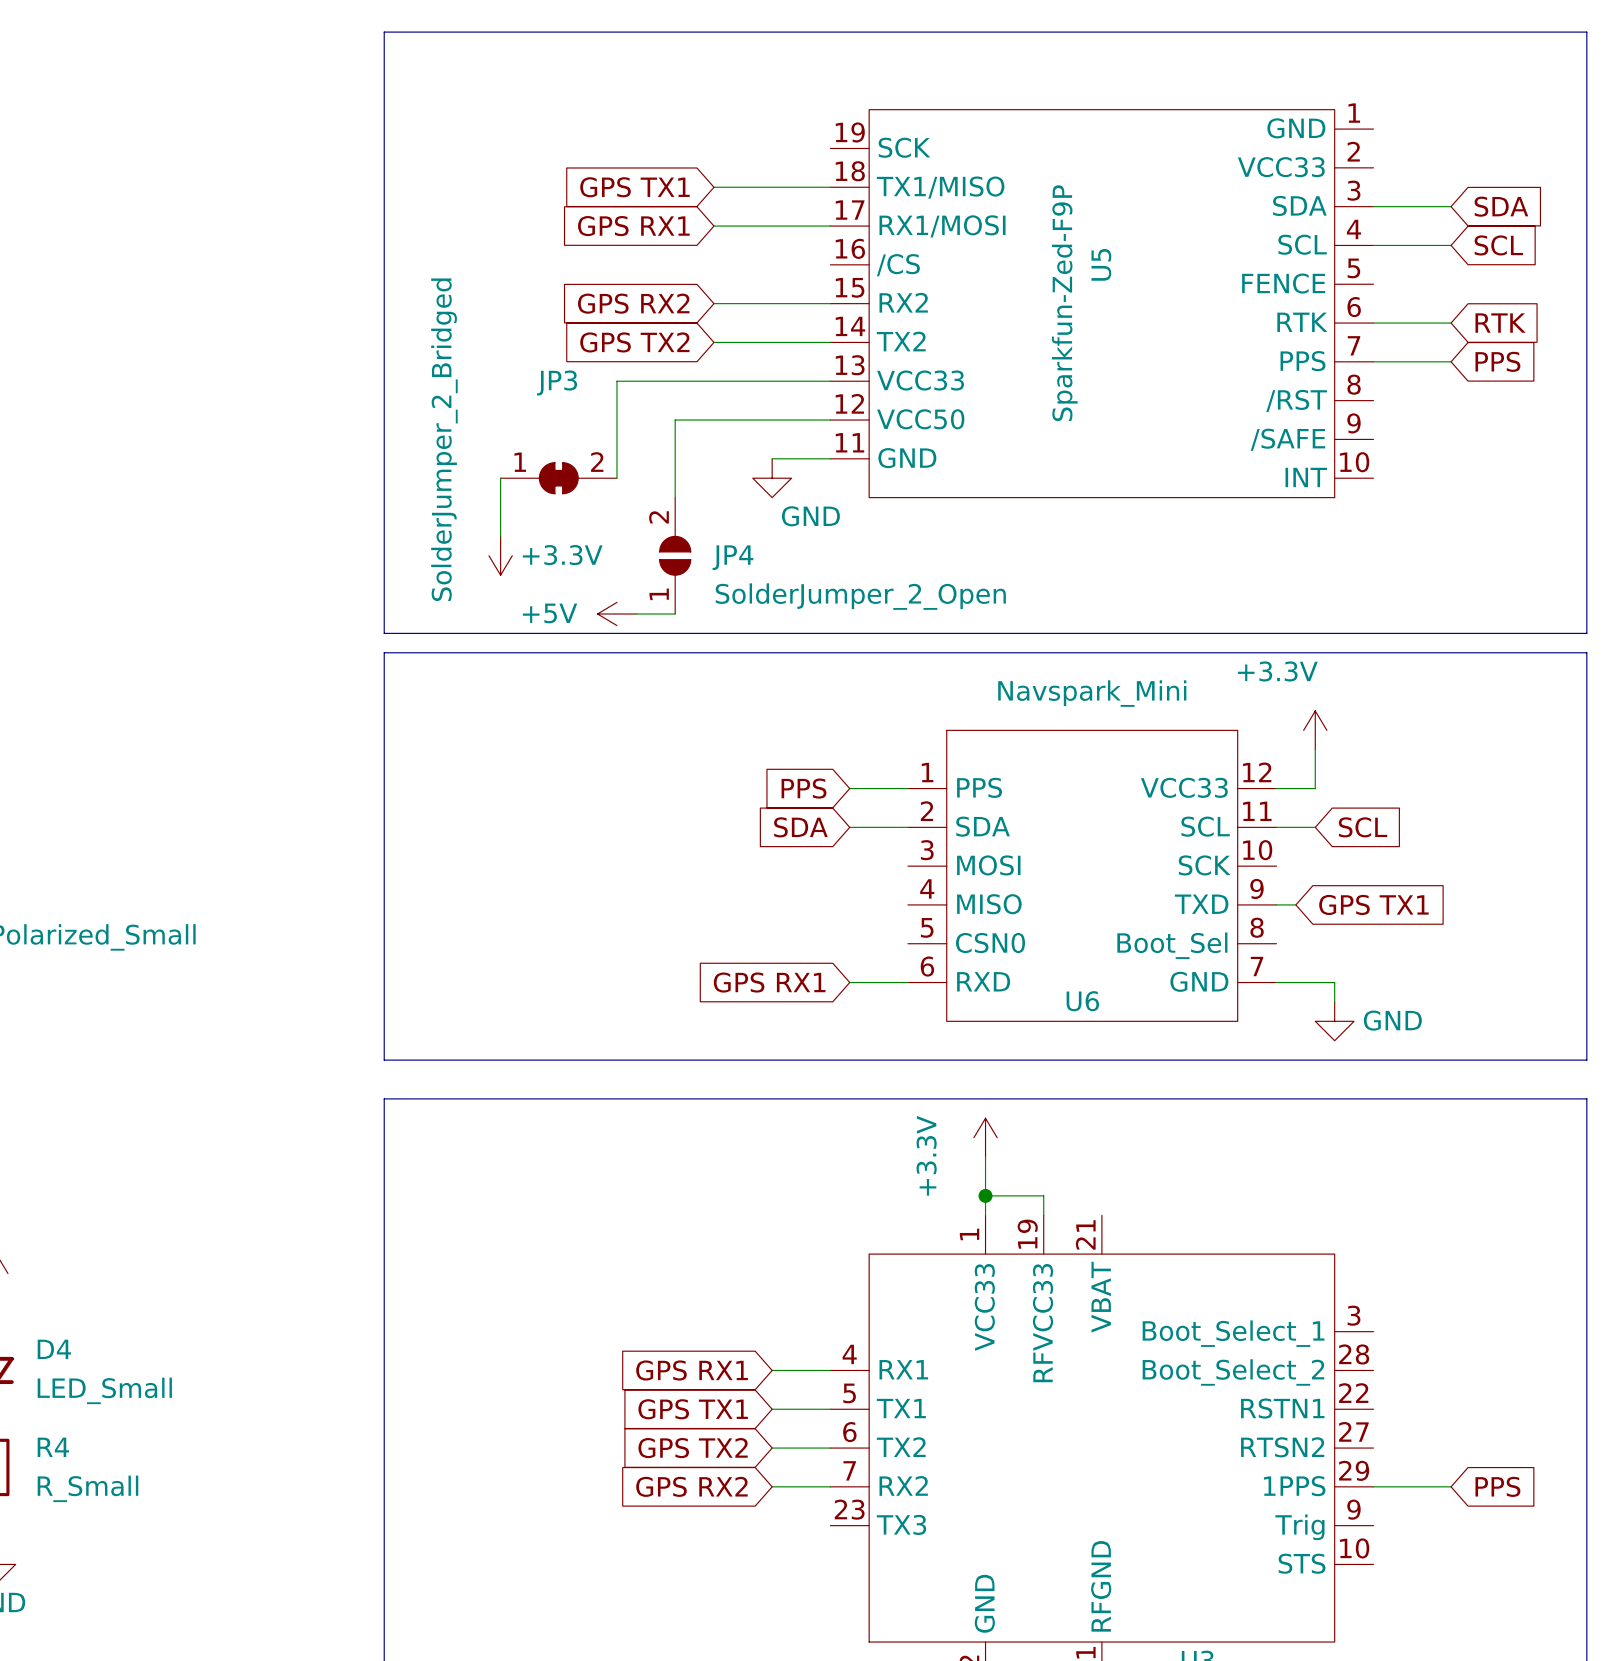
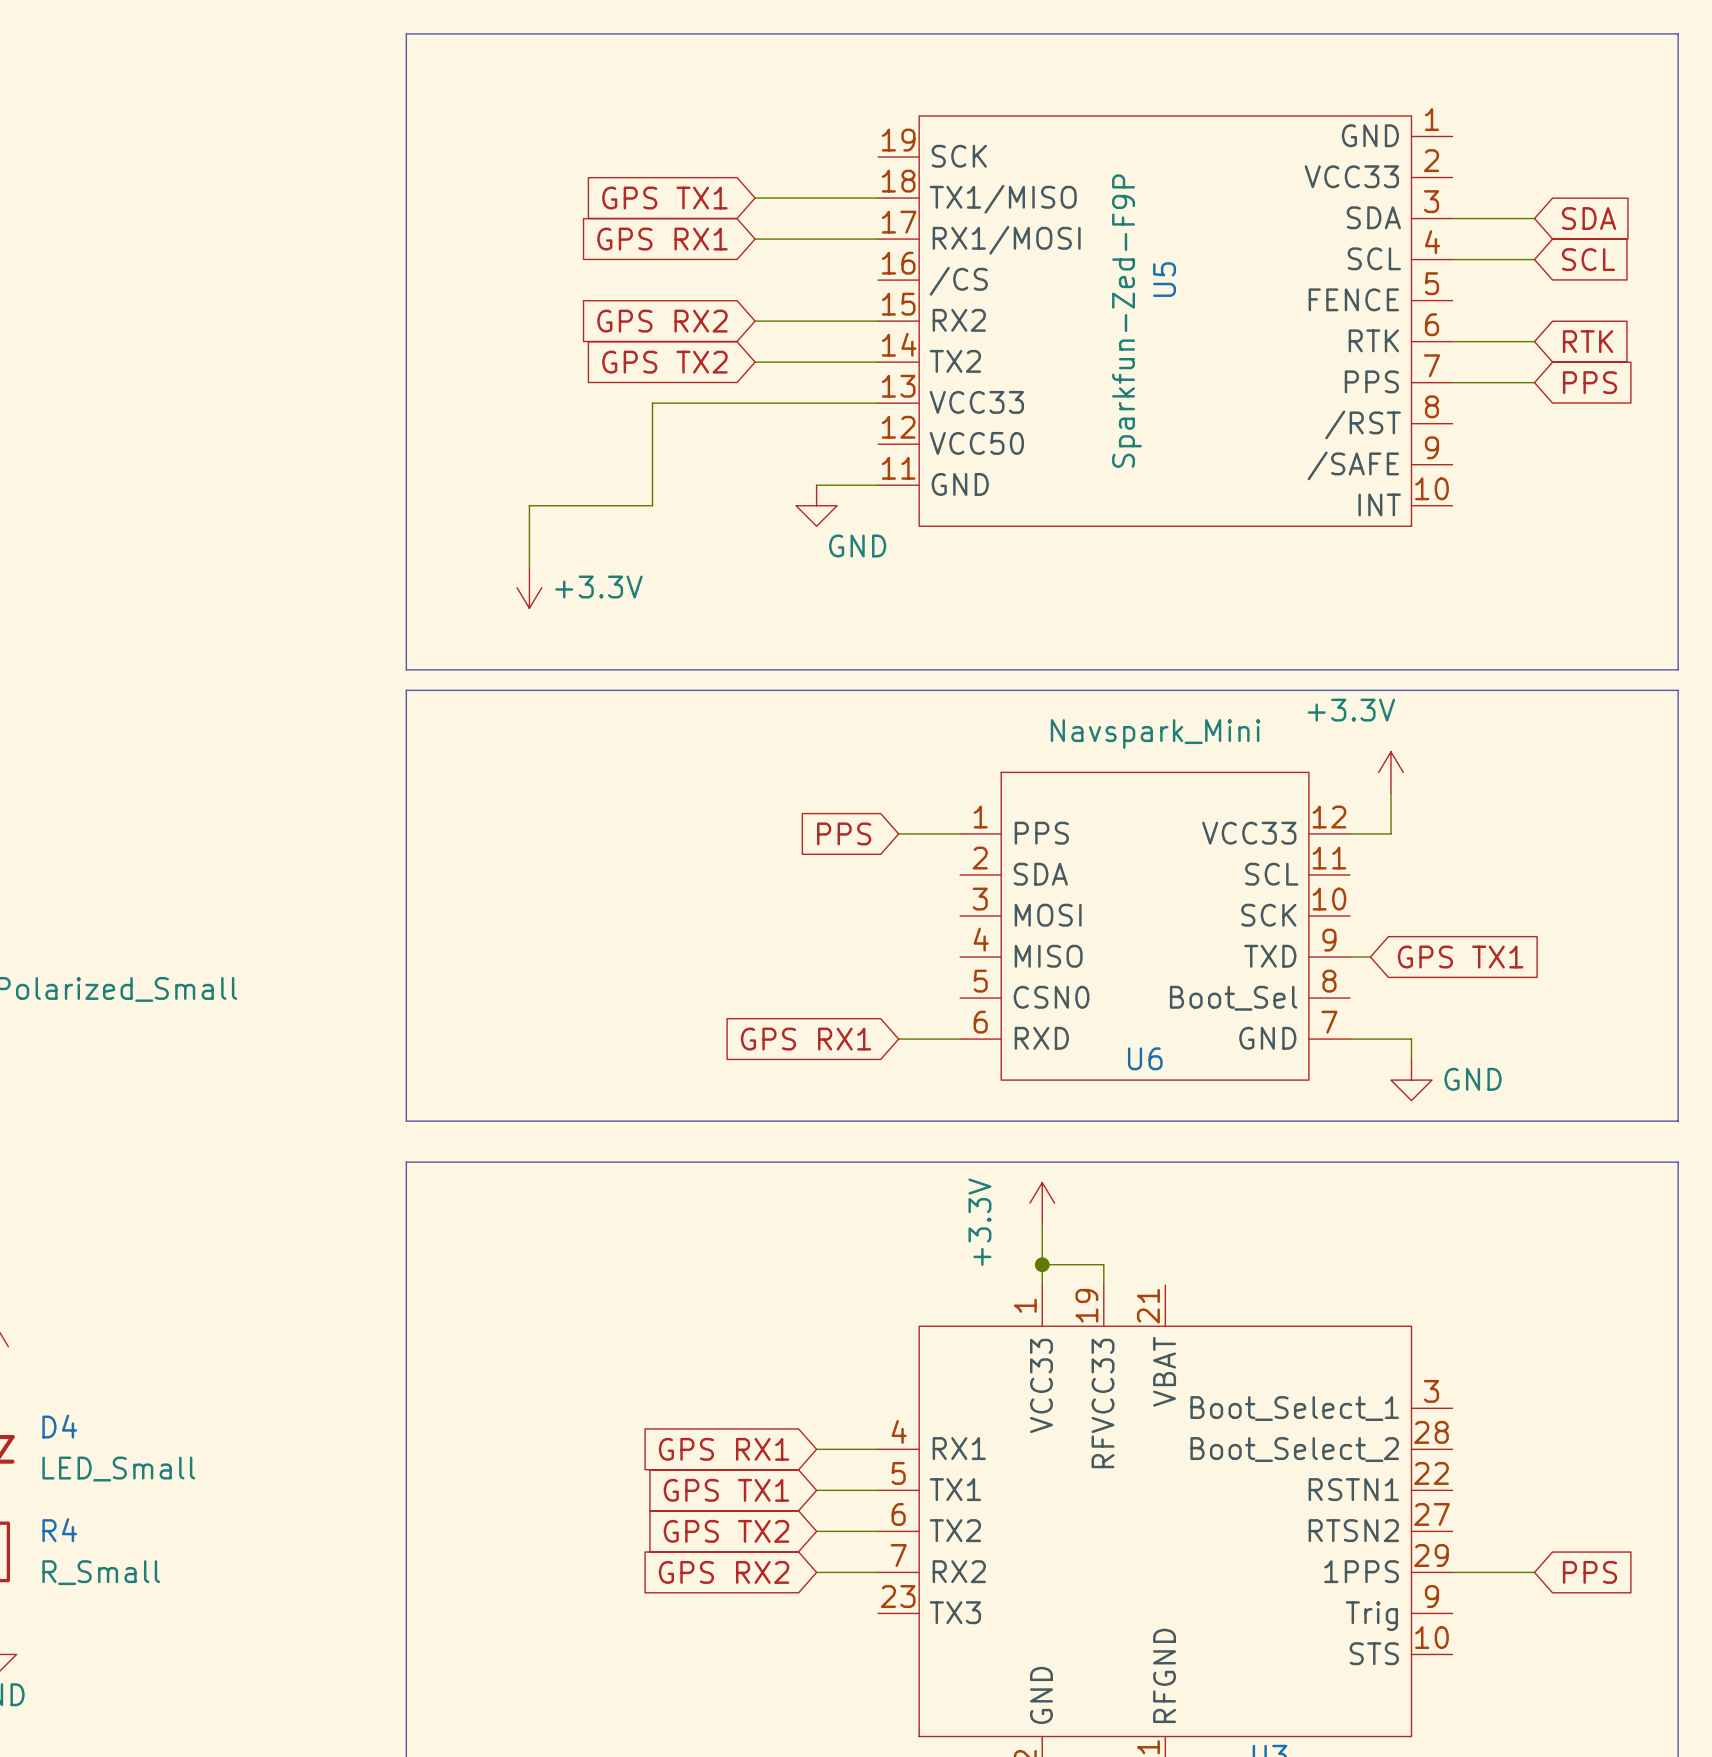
wire: (830, 420) (675, 420) (675, 497) -> none
JP3: SolderJumper_2_Bridged (558, 478) -> none
JP4: SolderJumper_2_Open (675, 555) -> none
power symbol: +5V (616, 613) -> none
wire: (636, 613) (675, 613) -> none
global label: SDA (800, 827) -> none
wire: (849, 827) (907, 827) -> none
wire: (1276, 827) (1315, 827) -> none
global label: SCL (1363, 827) -> none

